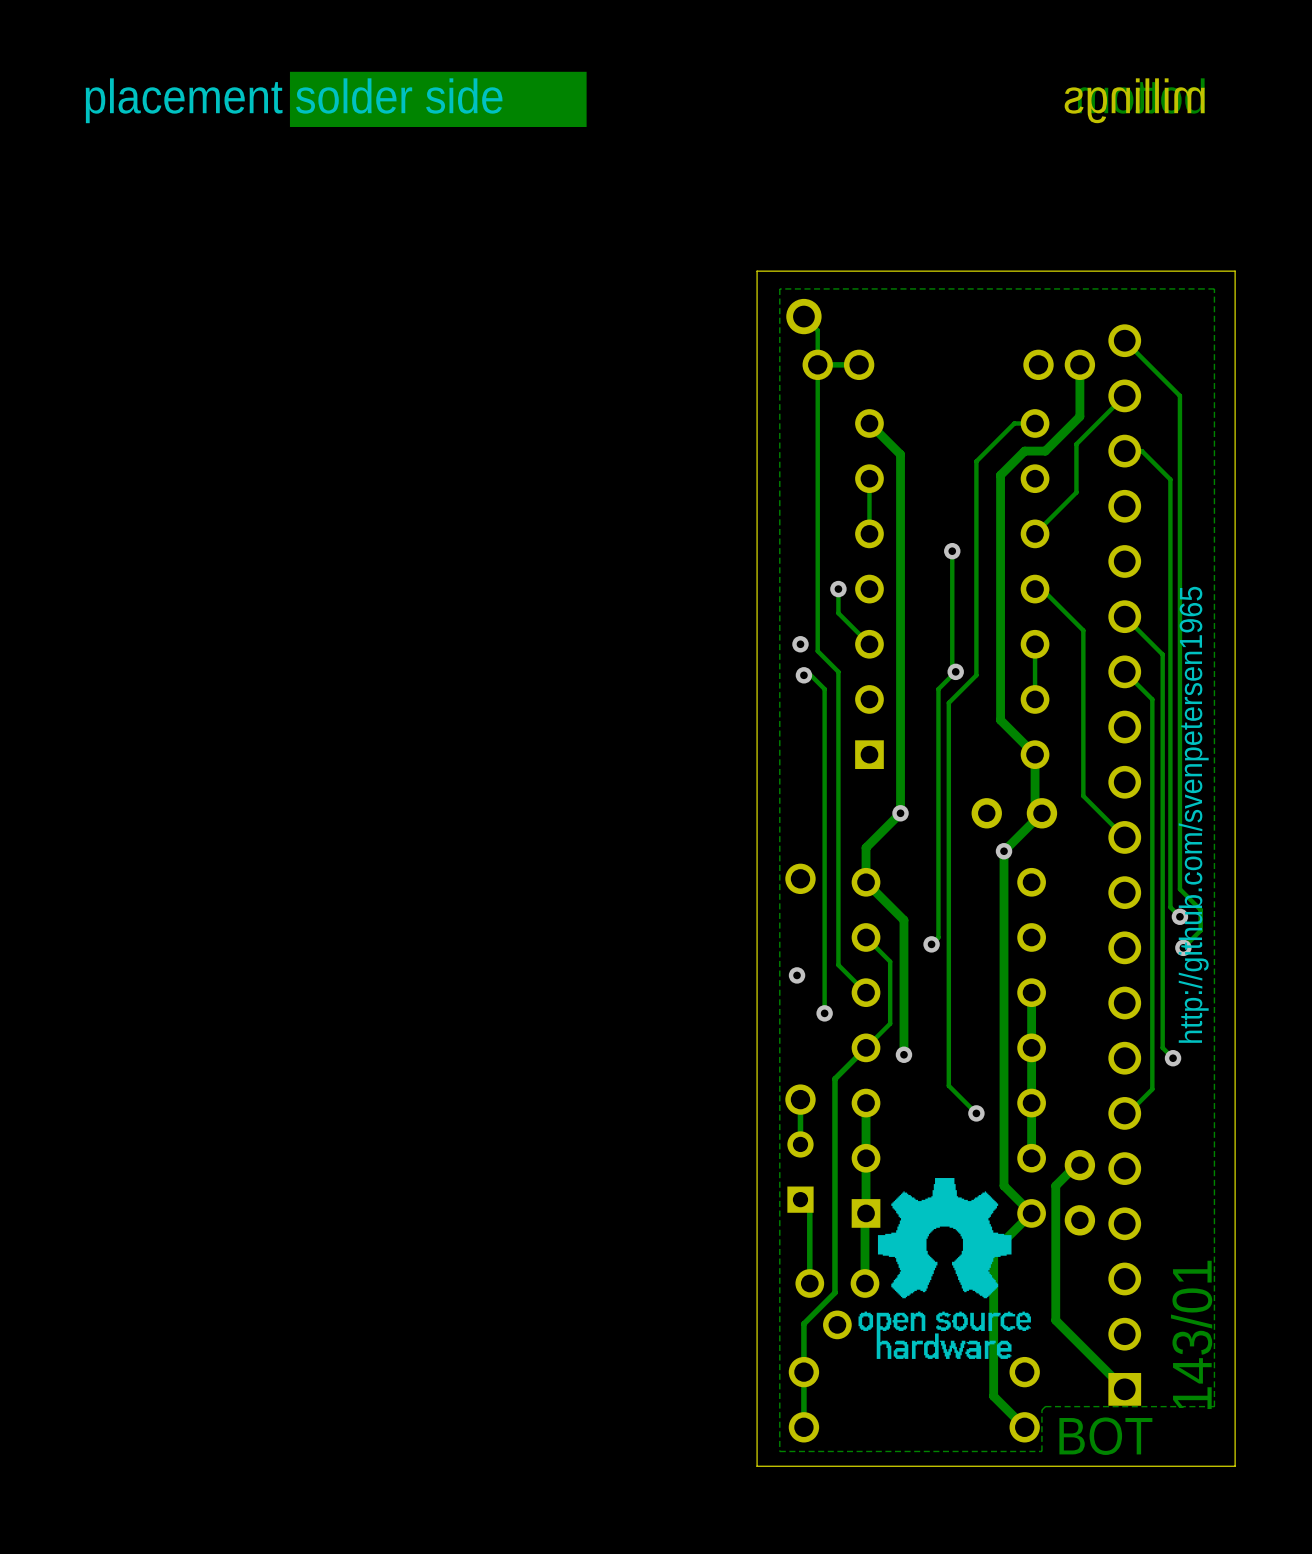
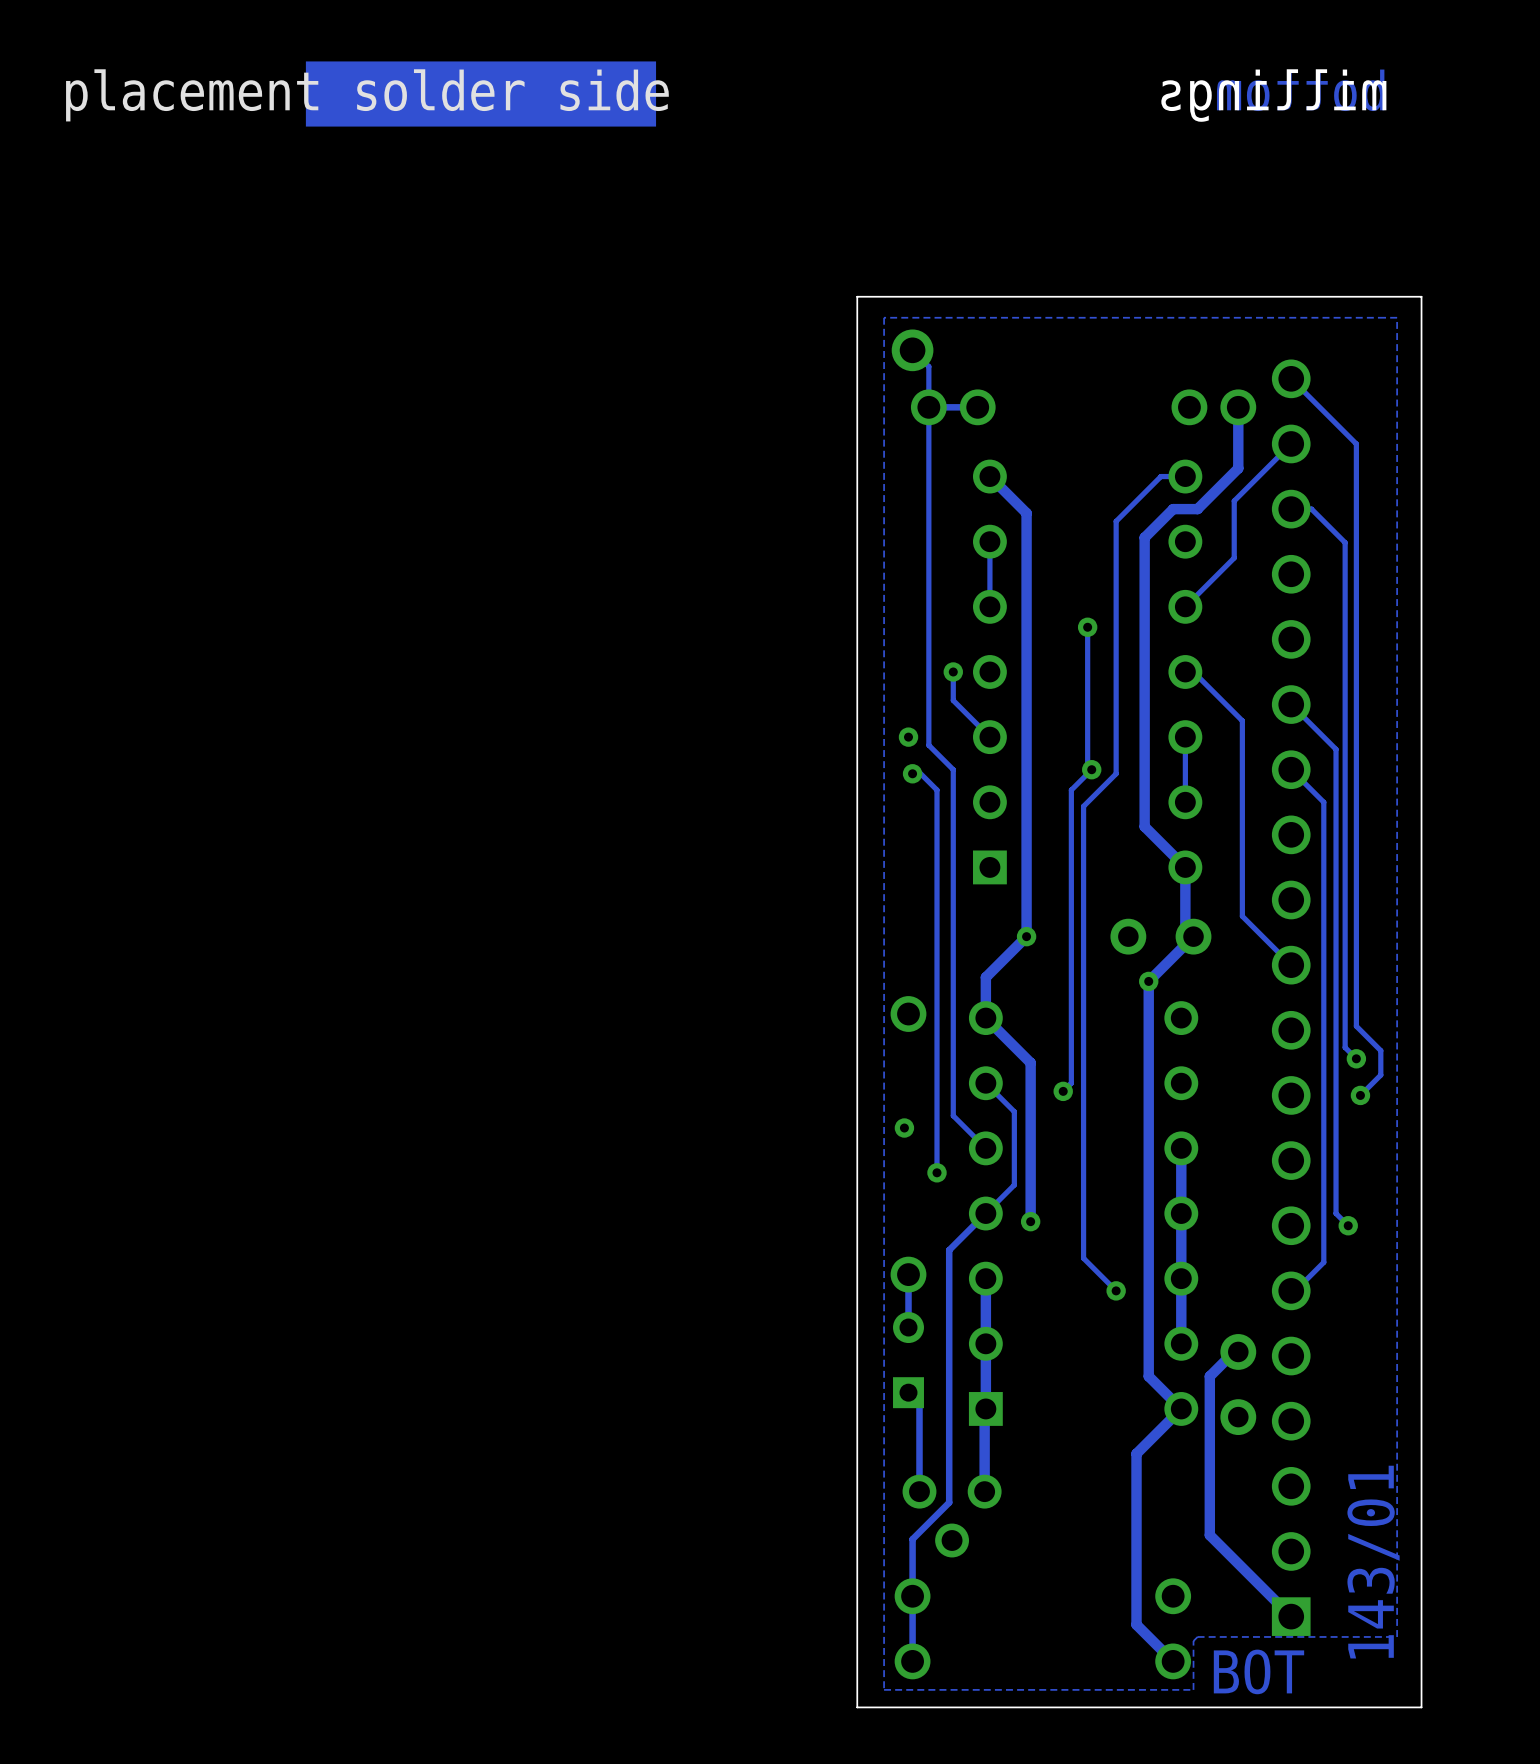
text: http://github.com/svenpetersen1965 (1193, 814) -> none
drawing: [858, 1178, 1031, 1359] -> none

